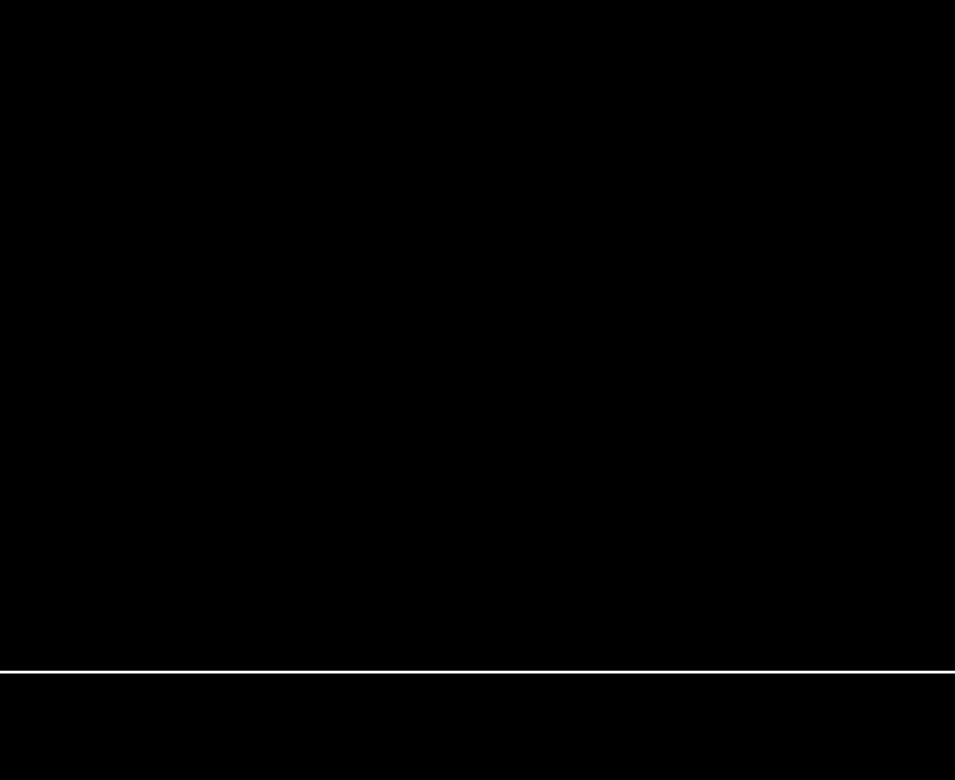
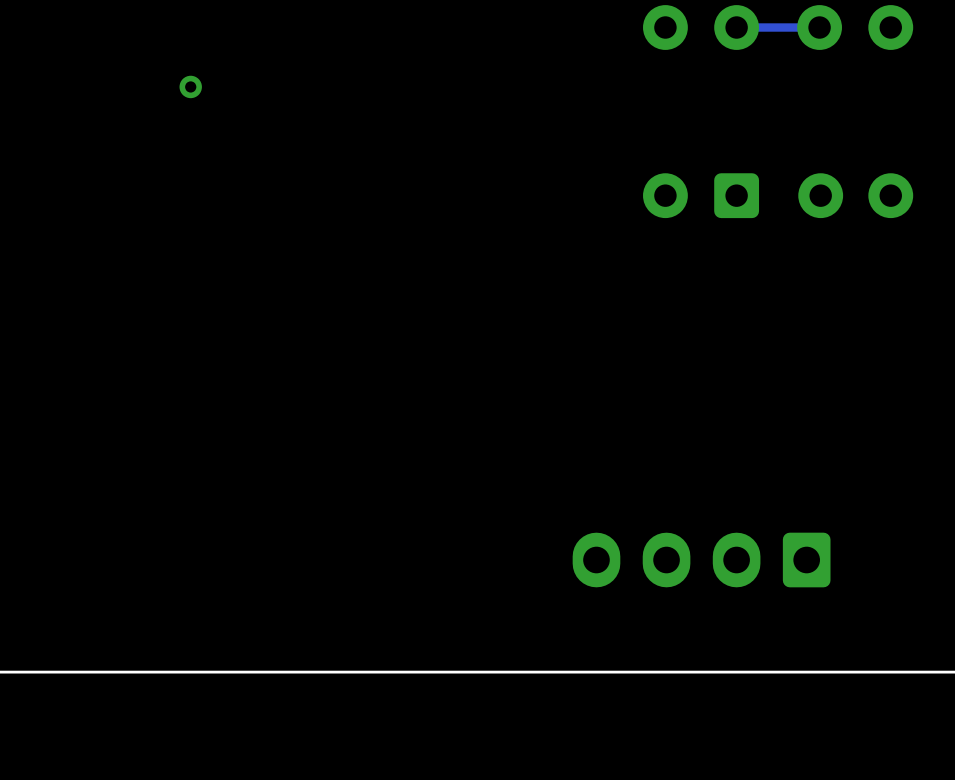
part: none -> (701, 27)
track: none -> (819, 27) (736, 27)
part: none -> (855, 27)
via: none -> (190, 86)
part: none -> (701, 195)
part: none -> (855, 195)
part: none -> (701, 560)

